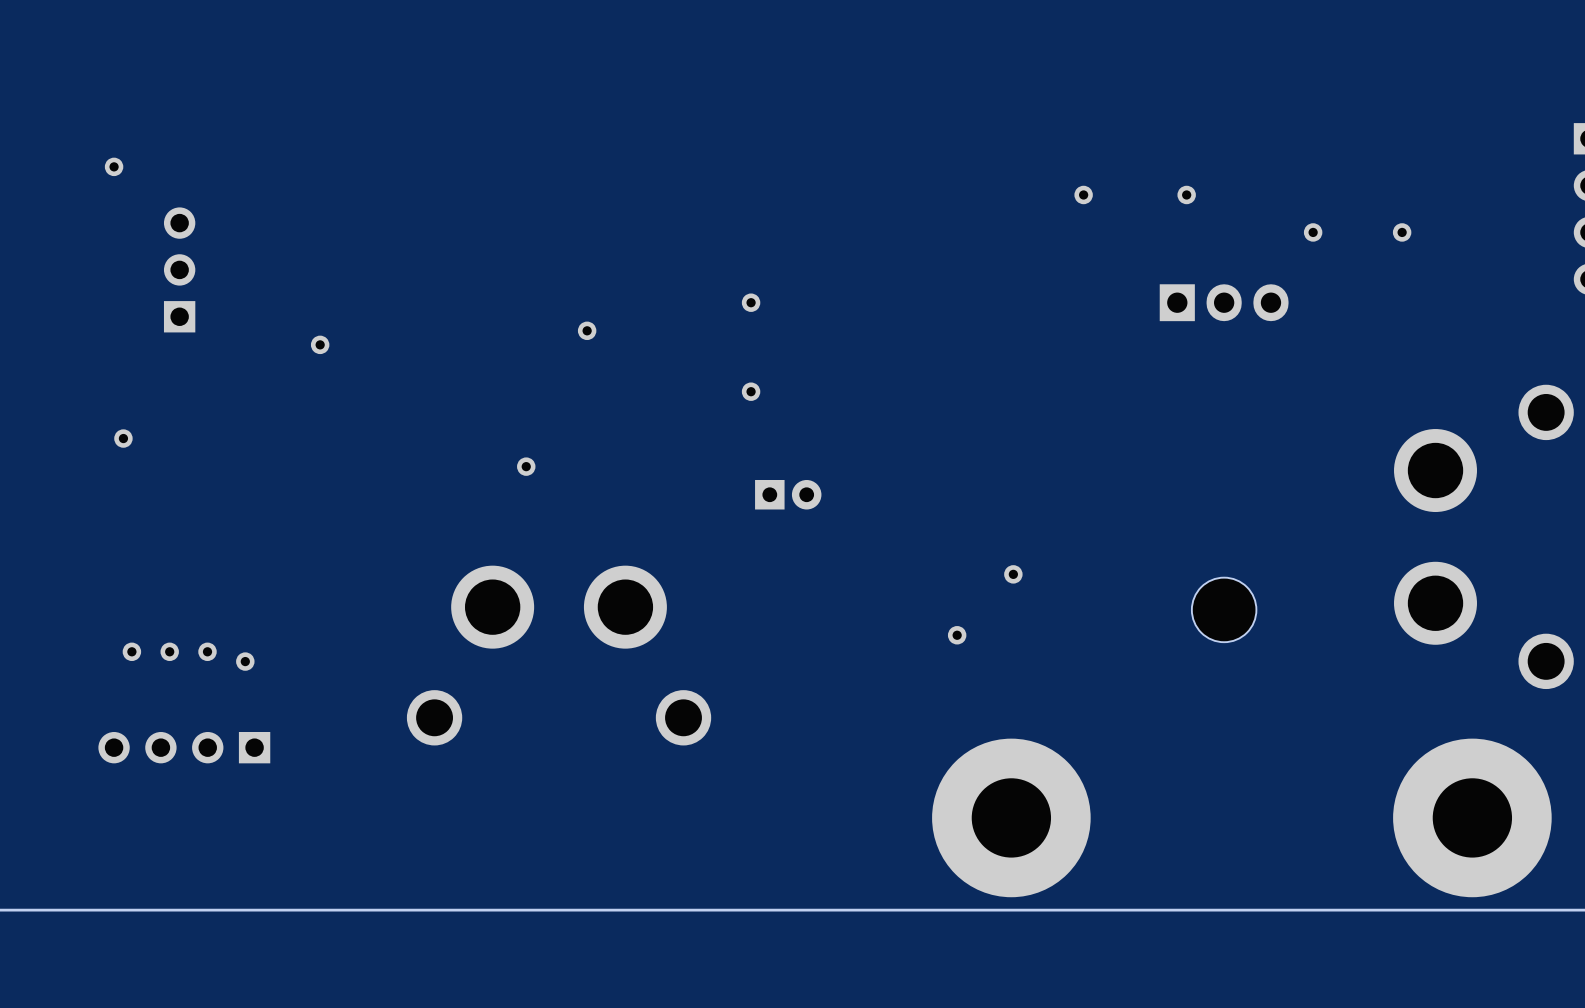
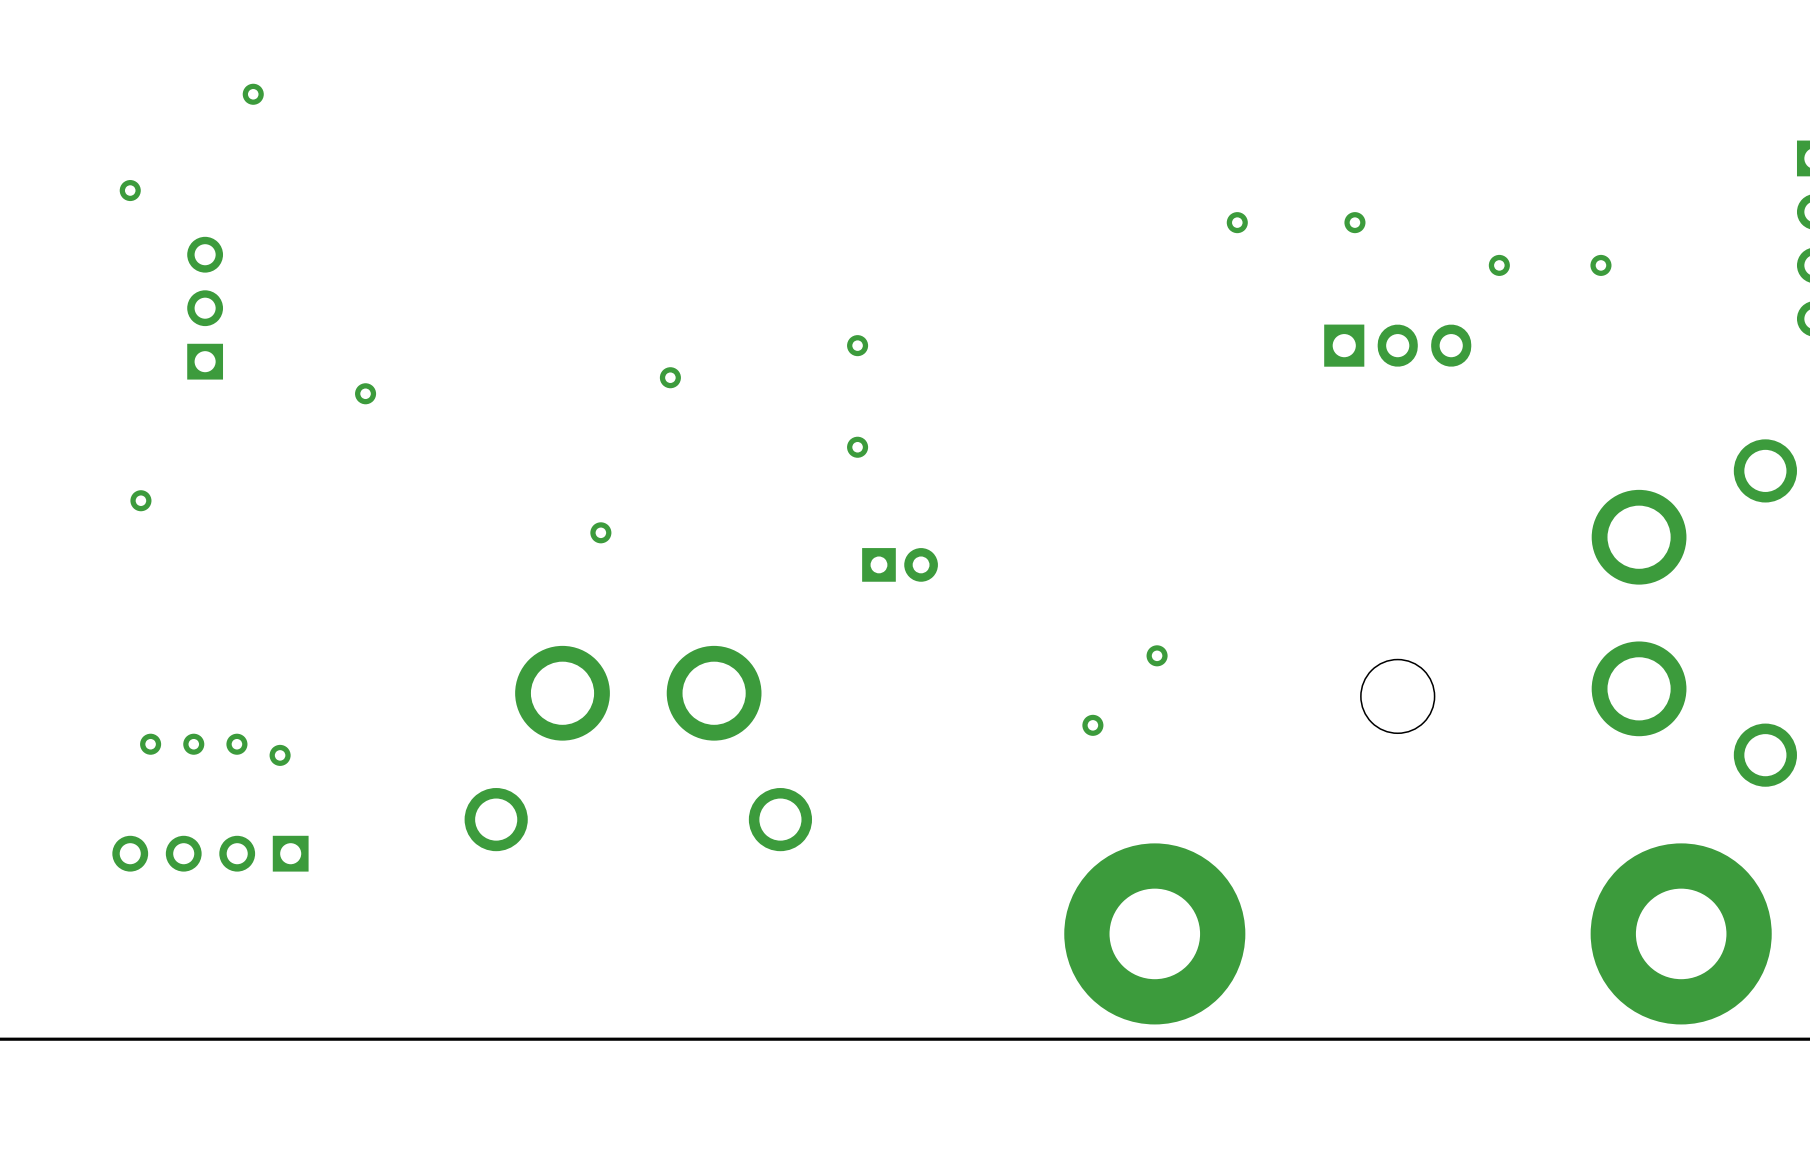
part: none -> (253, 94)

